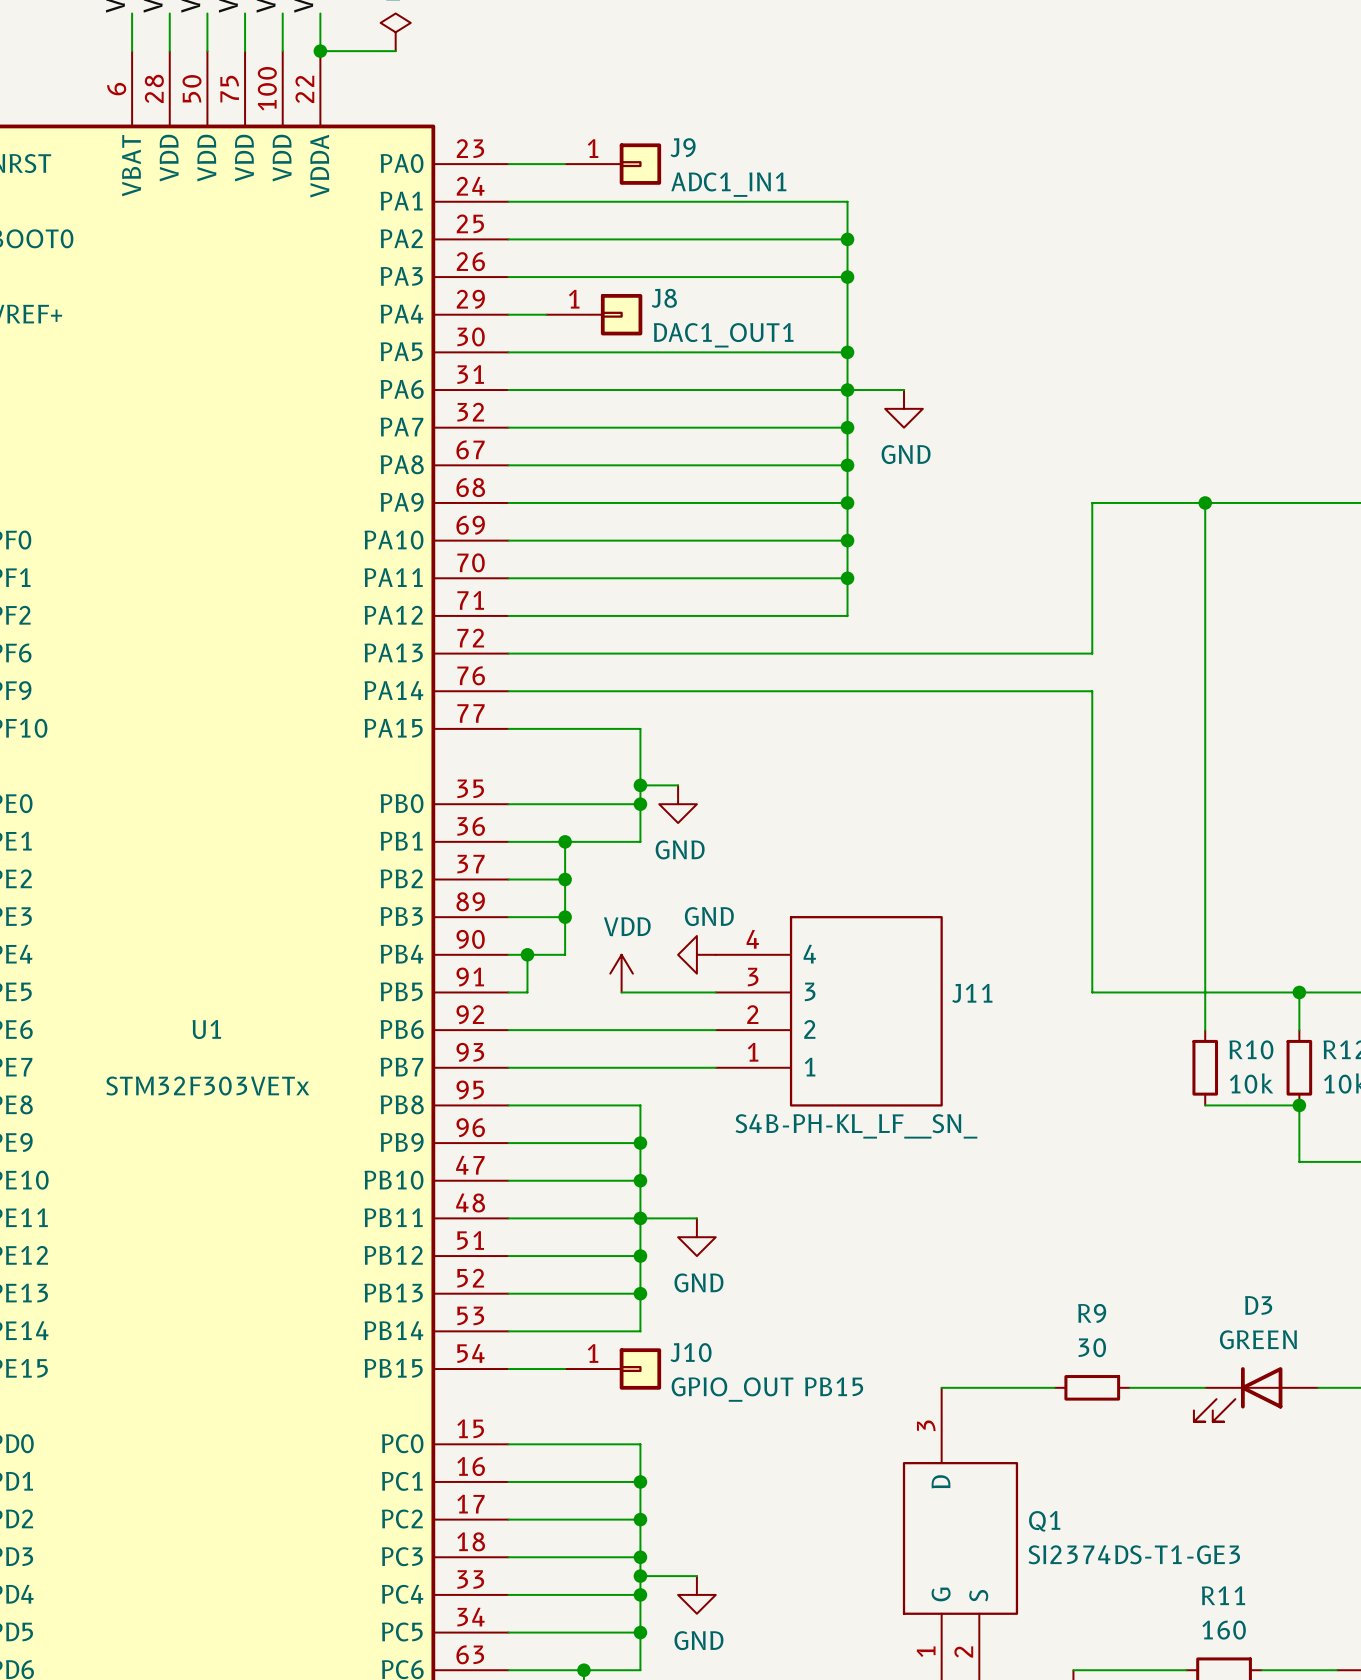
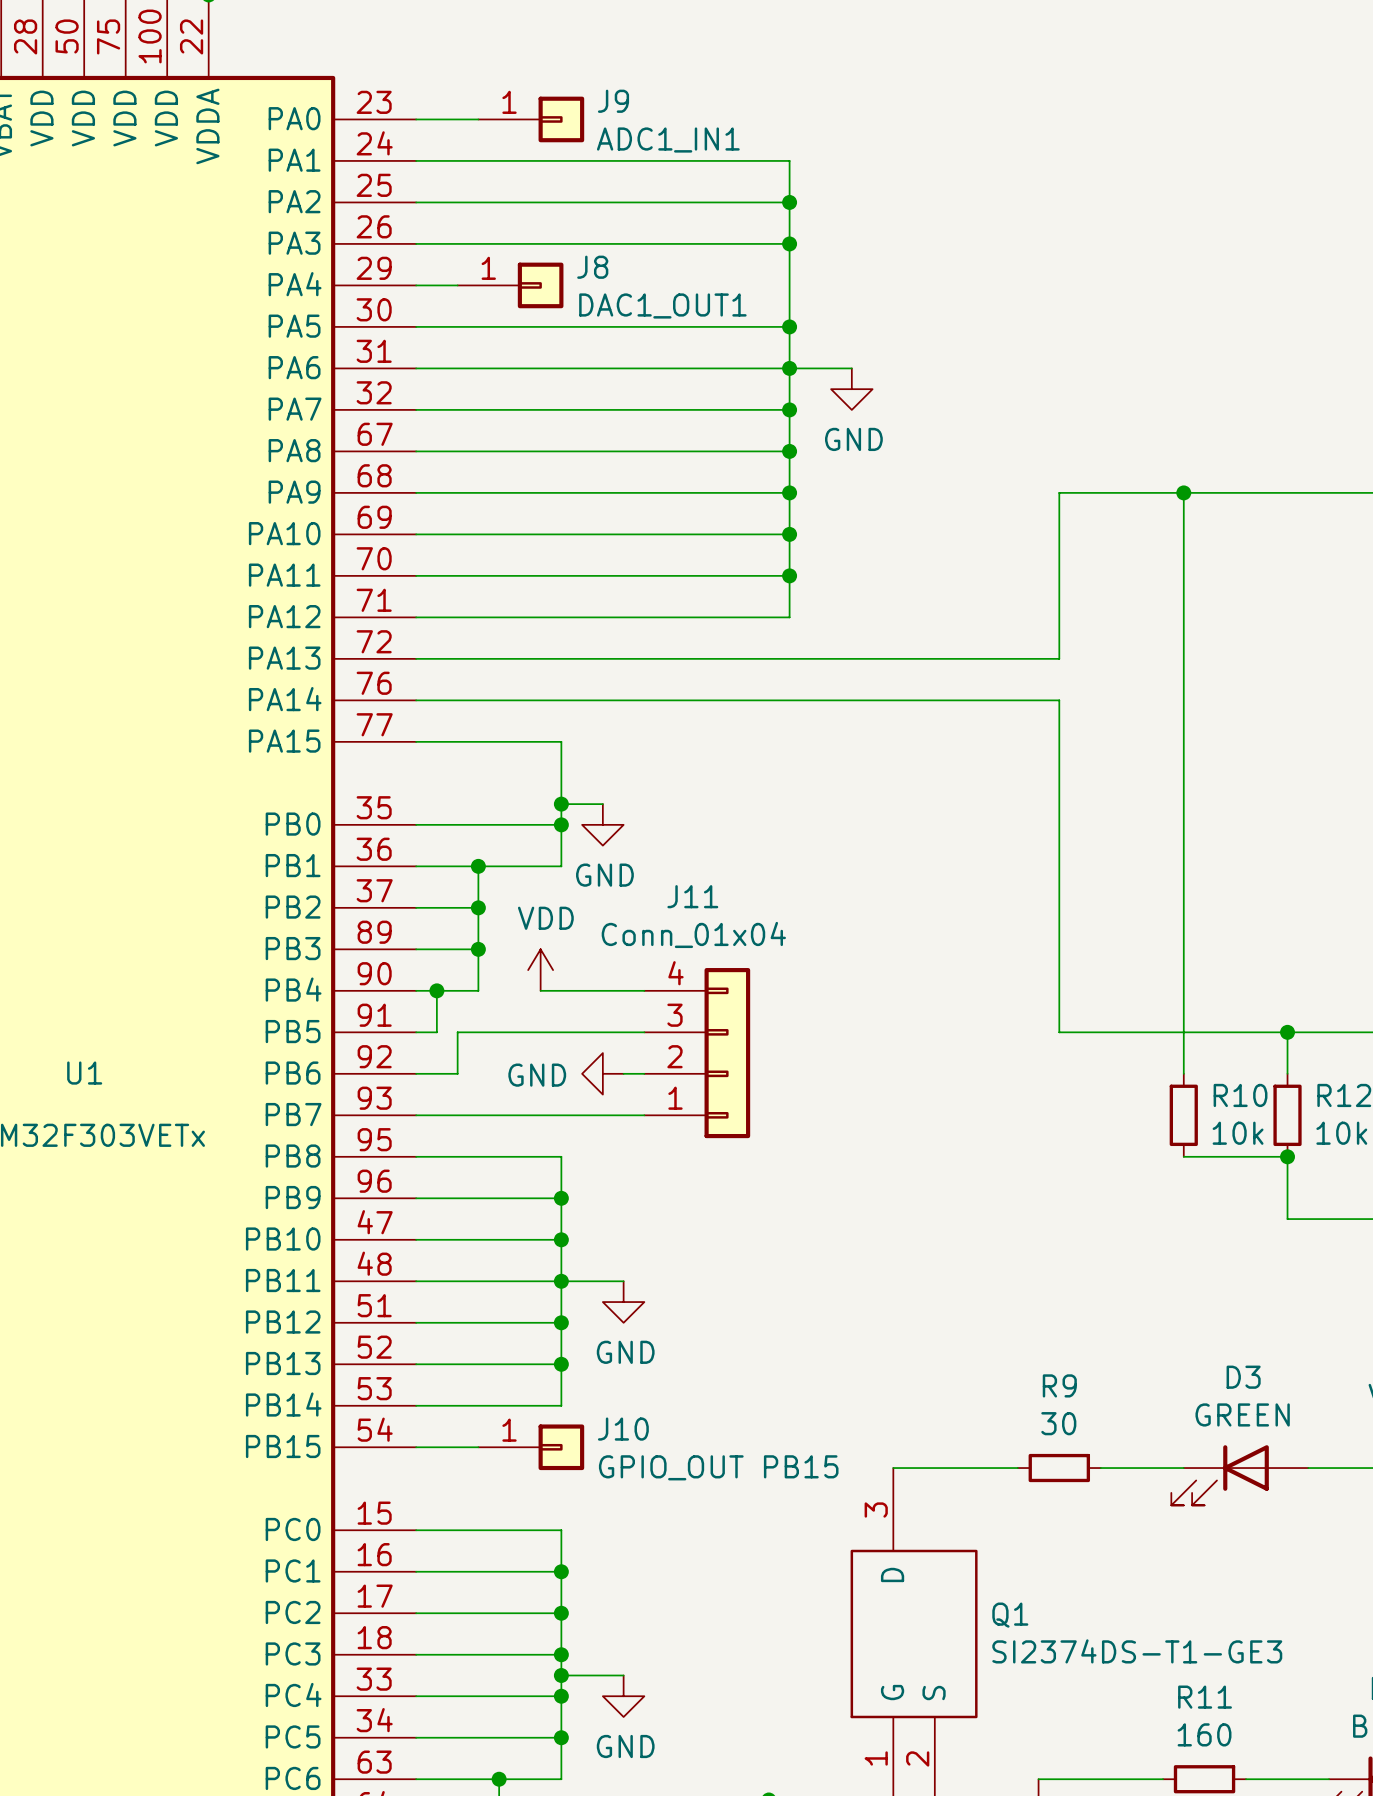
power symbol text position: GND (709, 916) -> GND (537, 1075)
J11 symbol: [715, 916, 943, 1107] -> [644, 968, 751, 1139]
wire: none -> (540, 990) (644, 990)
power symbol position: GND (696, 954) -> GND (602, 1073)
power symbol position: VDD (621, 973) -> VDD (540, 970)
J11 name position: J11 (972, 993) -> J11 (692, 896)
wire: (546, 1030) (696, 1030) -> (457, 1073) (457, 1032) (540, 1032)
J11 value: S4B-PH-KL_LF__SN_ (856, 1126) -> Conn_01x04 (693, 934)

